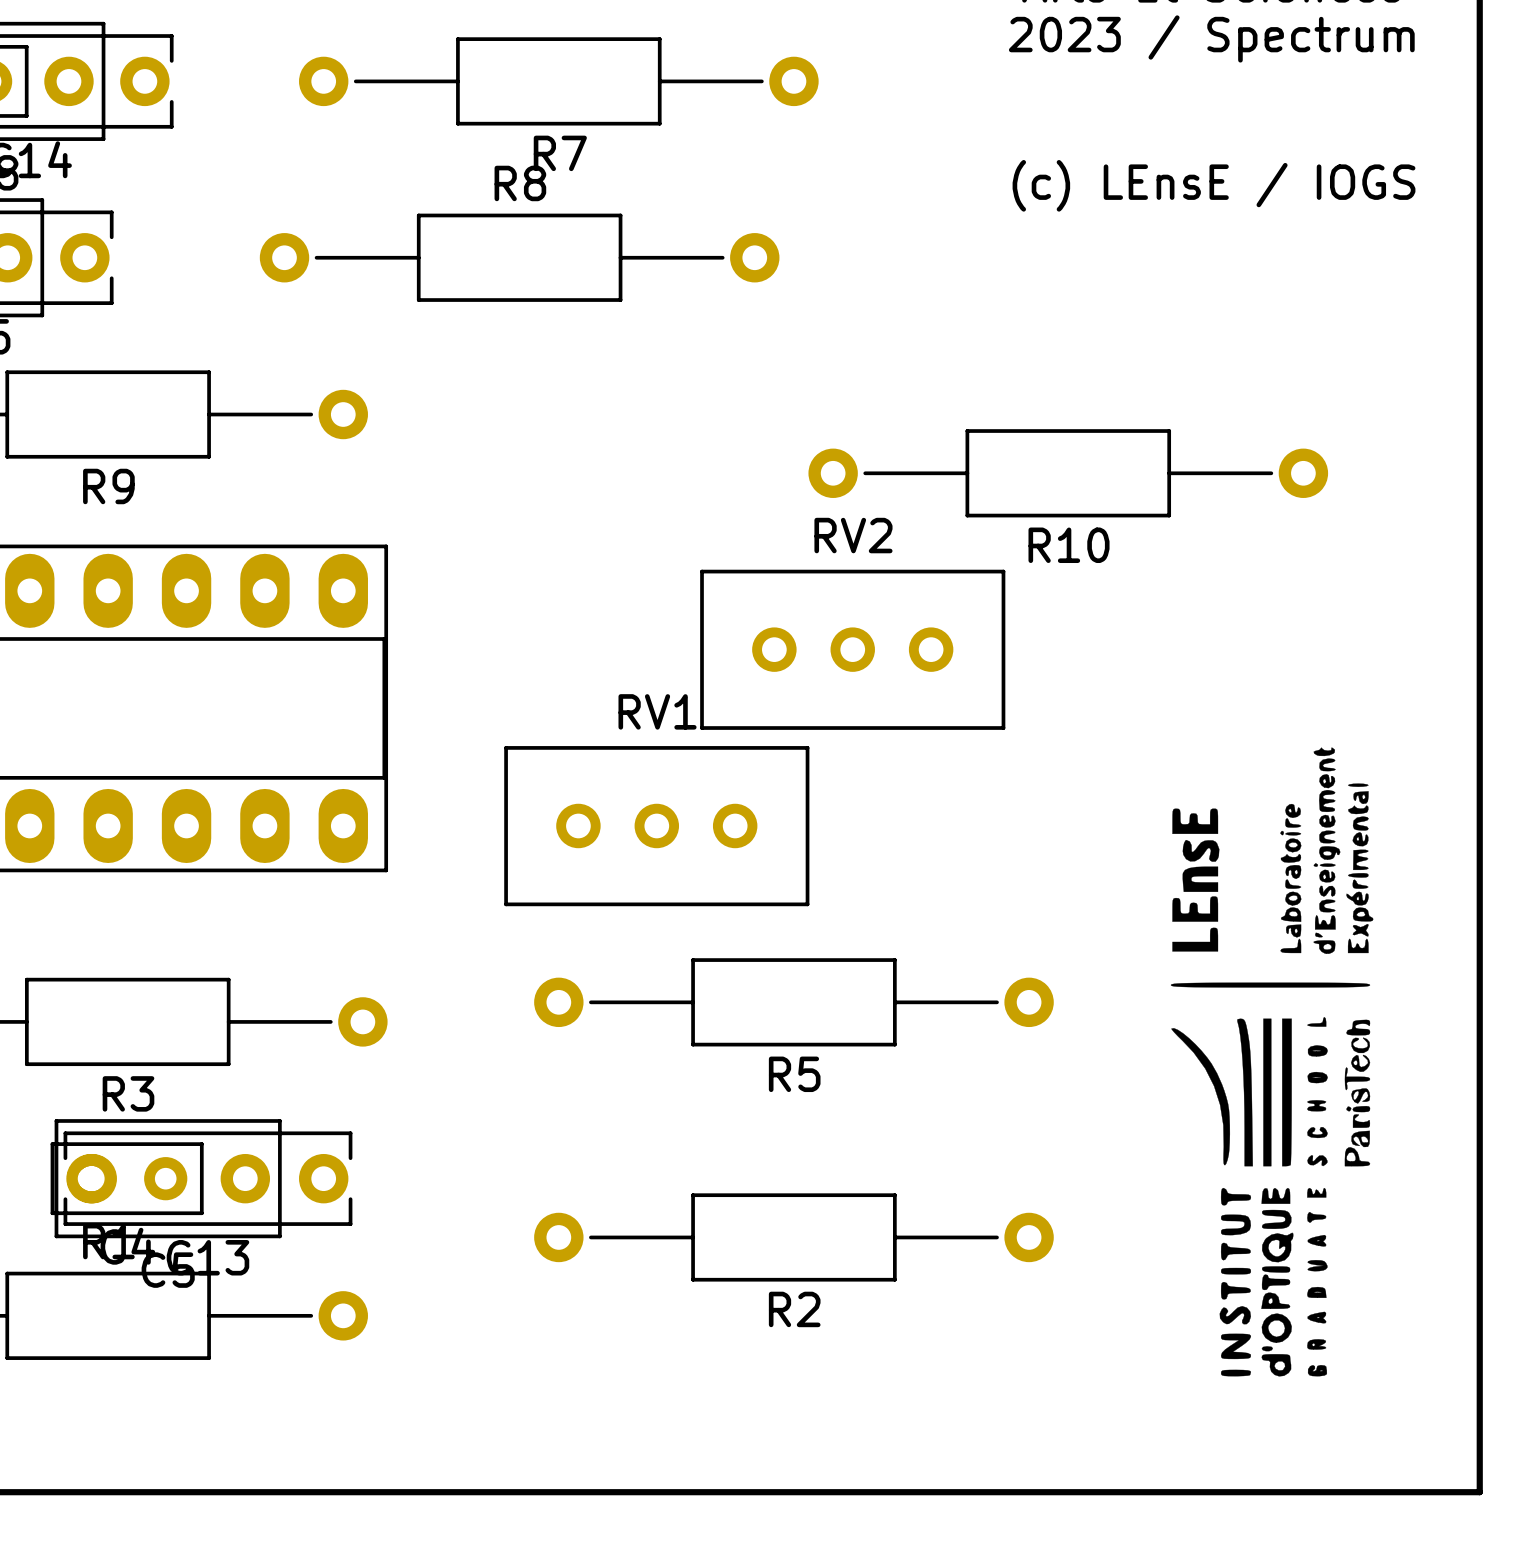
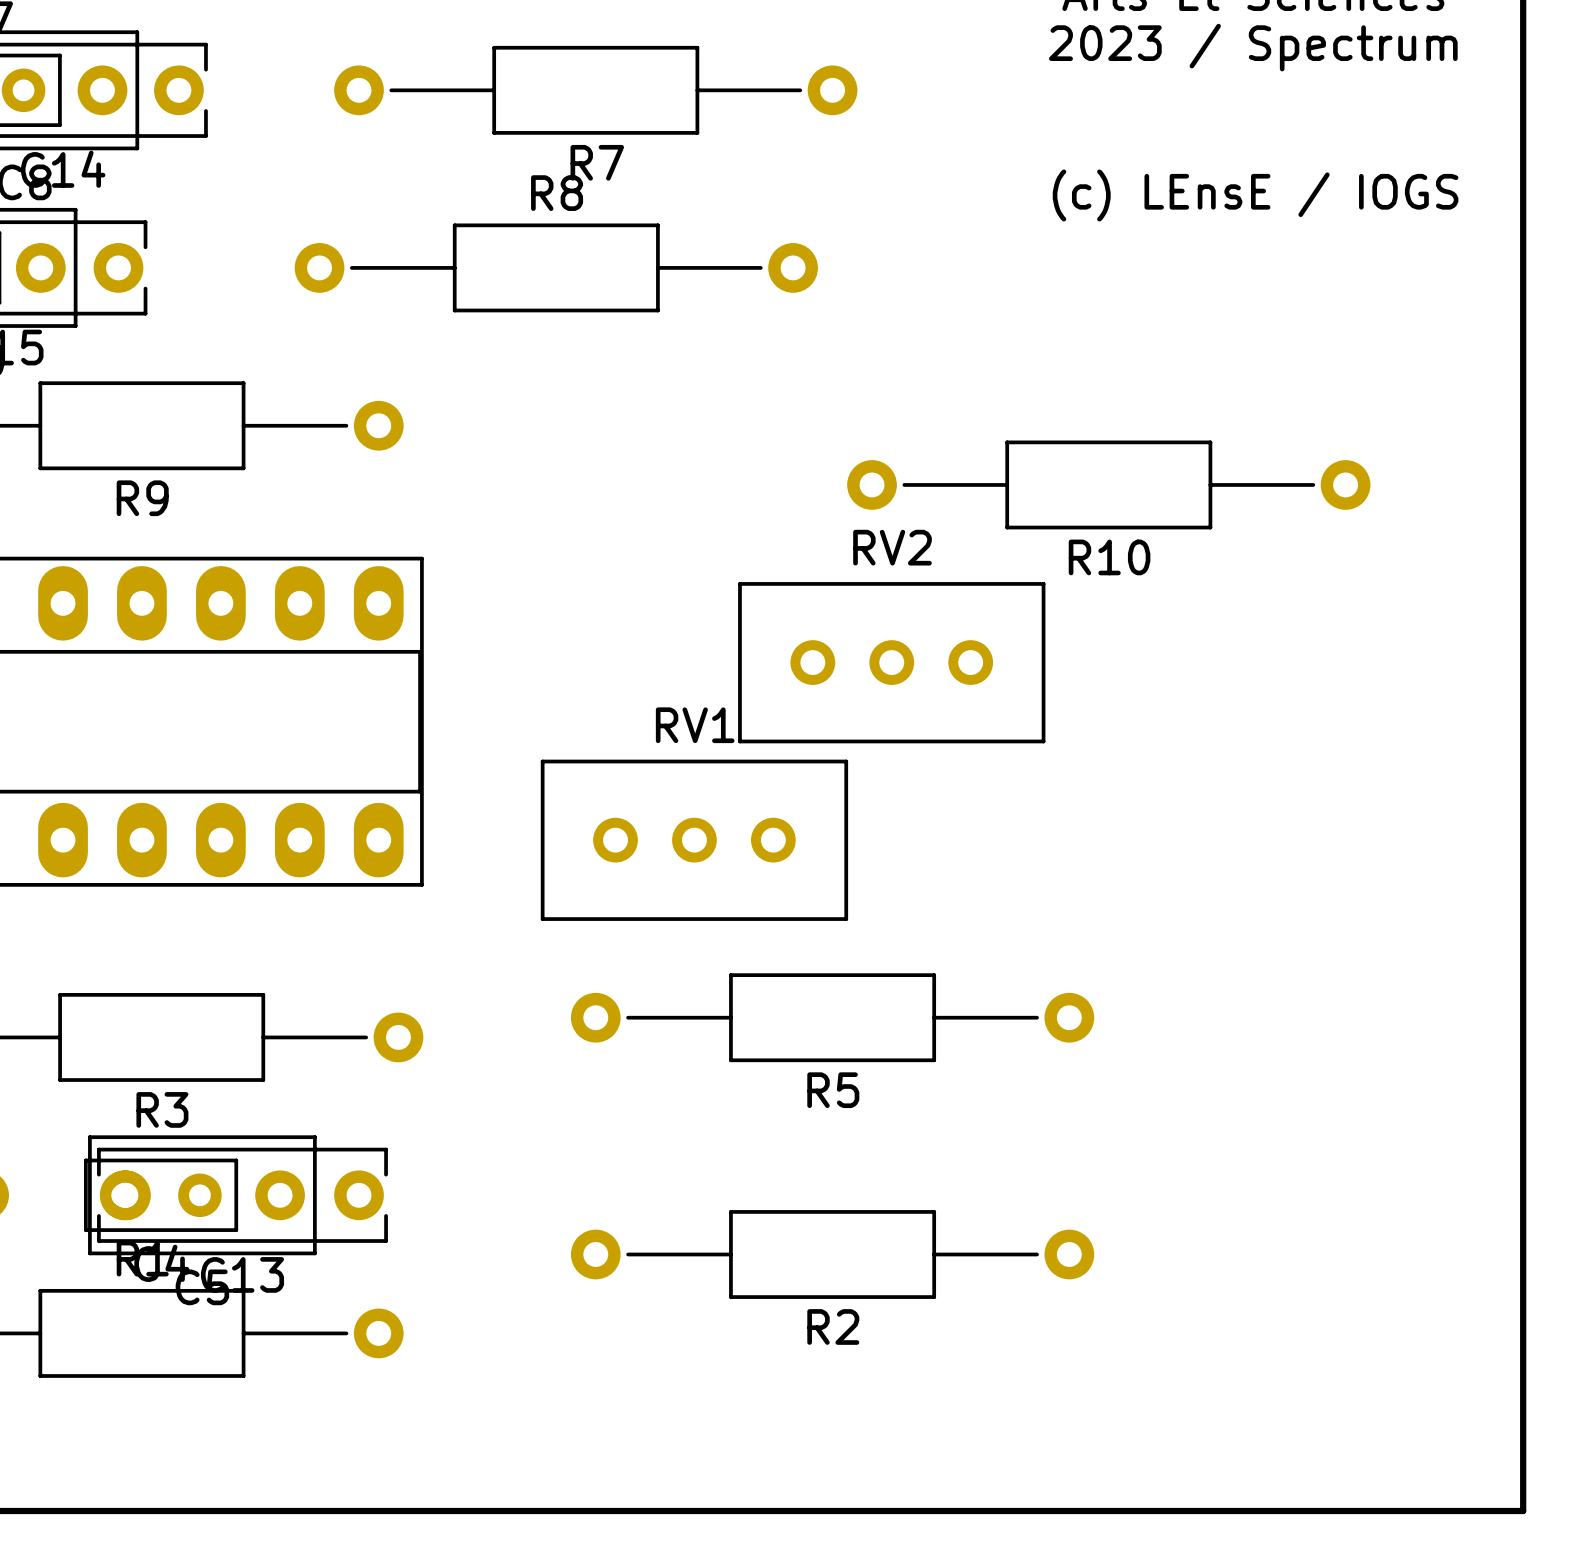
drawing: [1170, 747, 1374, 1377] -> none

